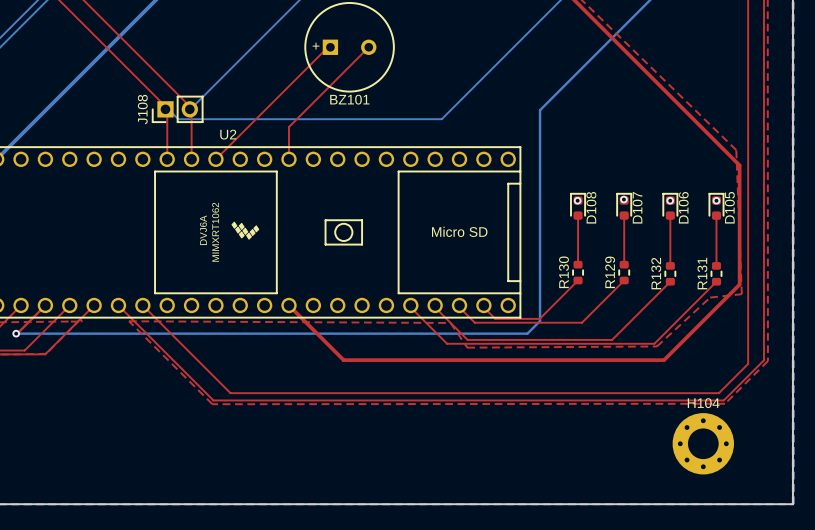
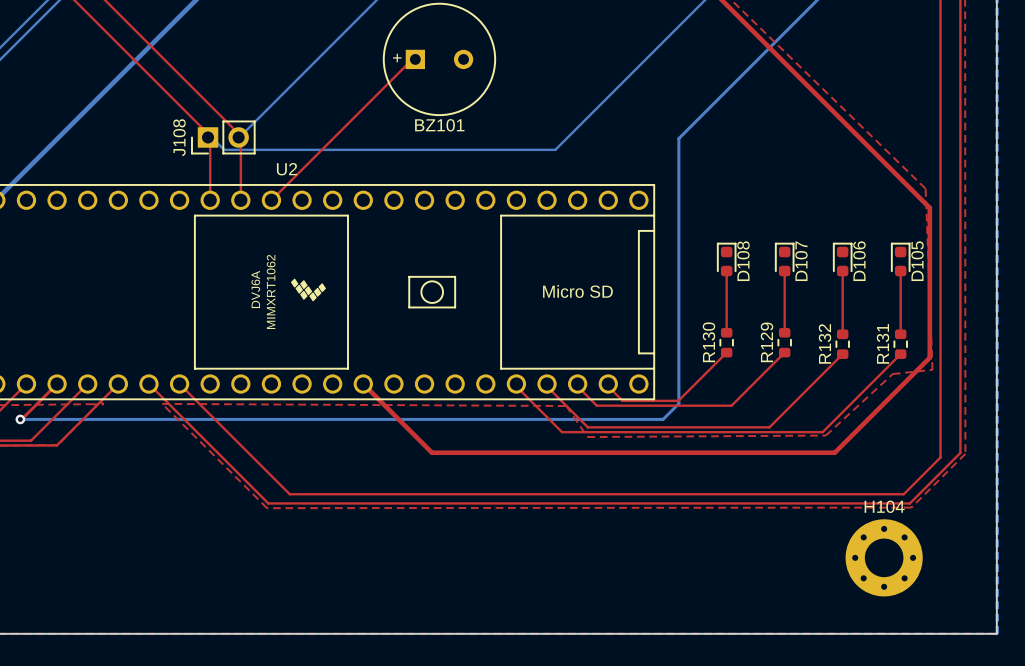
top track: (368, 47) (289, 127) (289, 159) -> none
via: (623, 199) -> none
via: (577, 200) -> none
via: (670, 200) -> none
via: (716, 200) -> none

